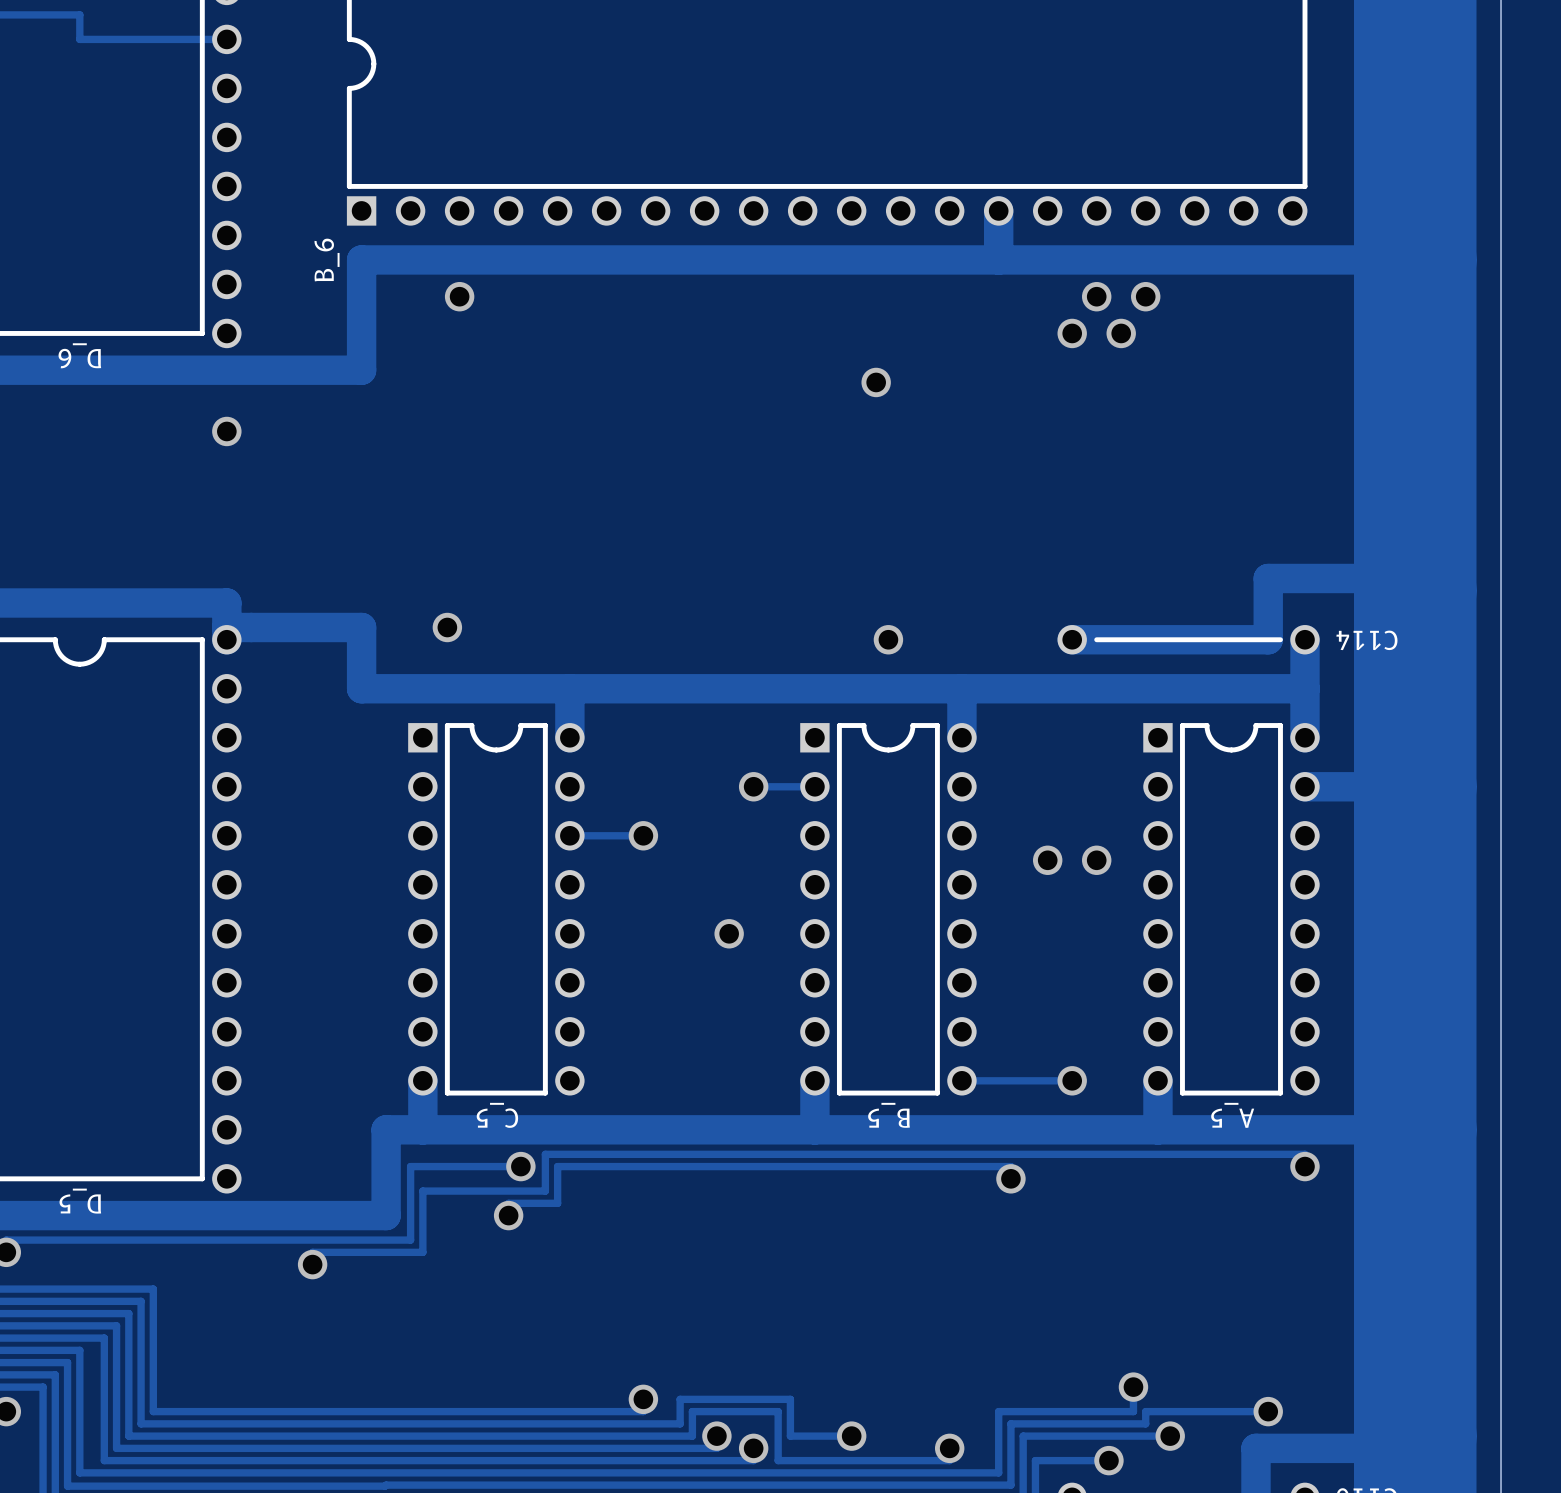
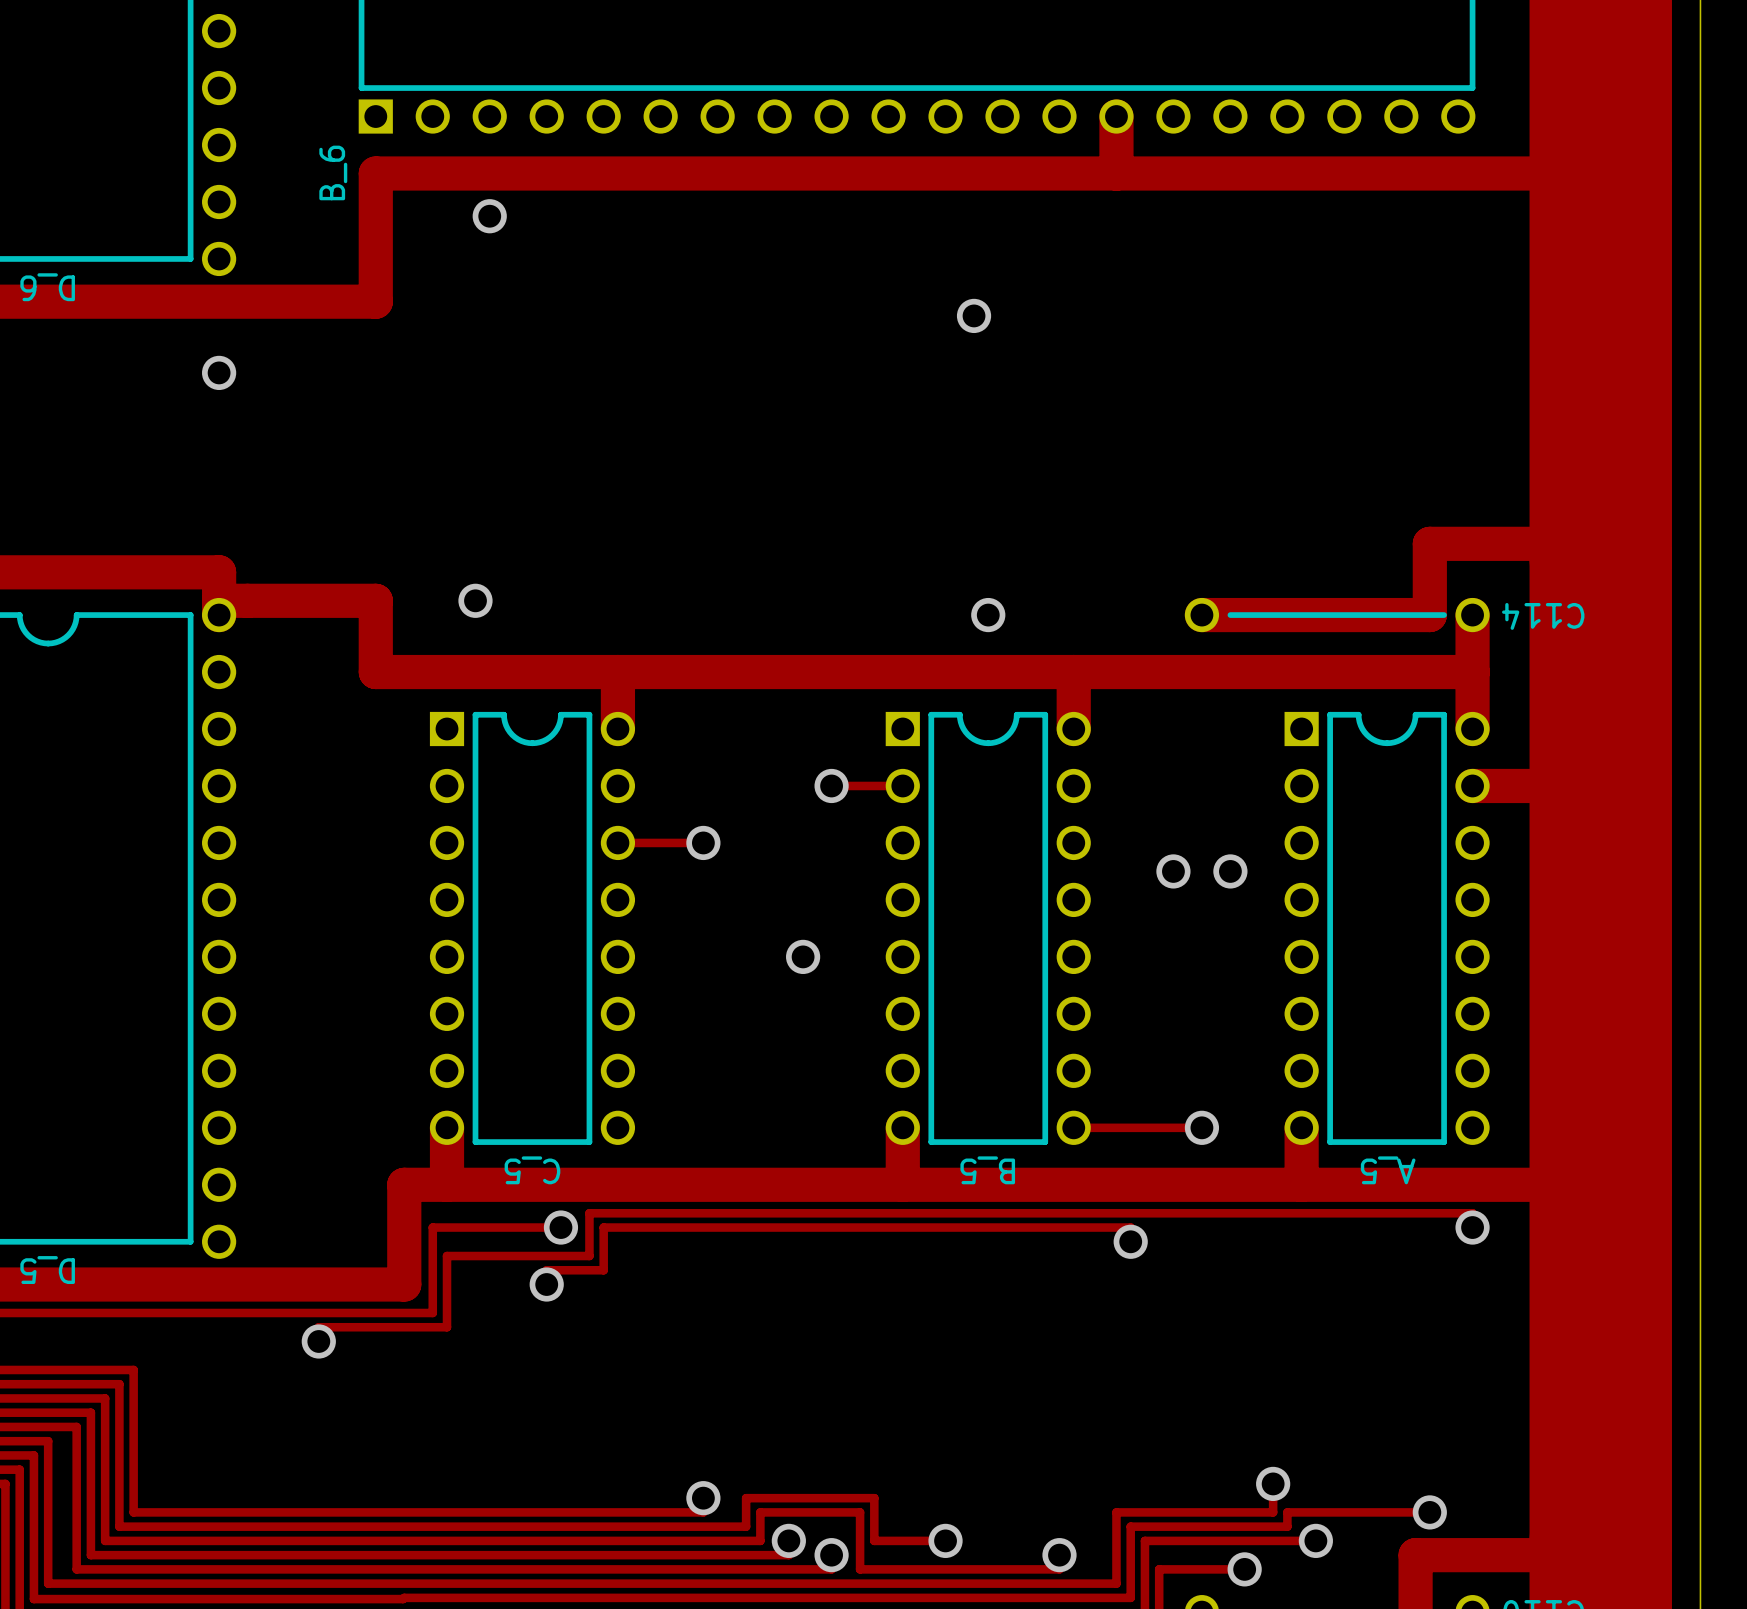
via: (1096, 296) -> none
via: (1145, 296) -> none
via: (1072, 333) -> none
via: (1121, 333) -> none

